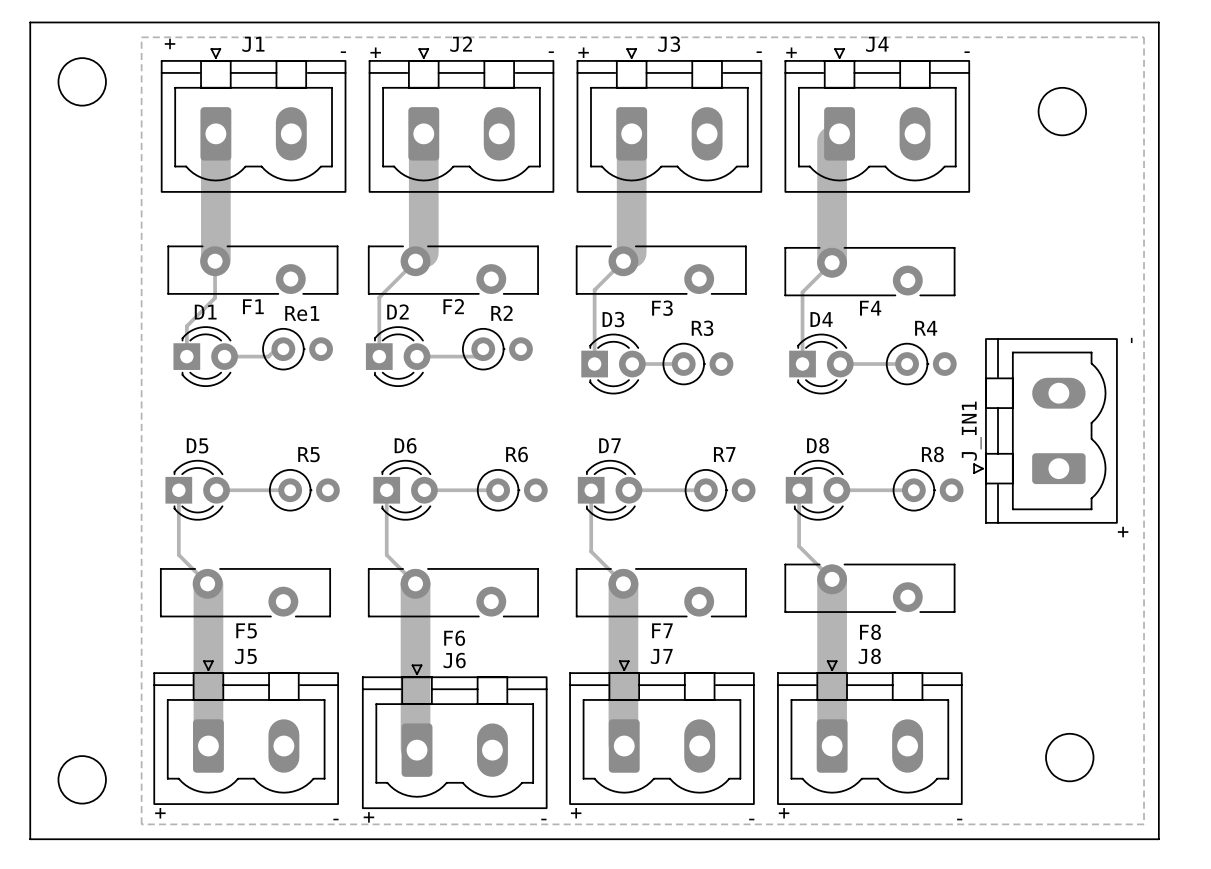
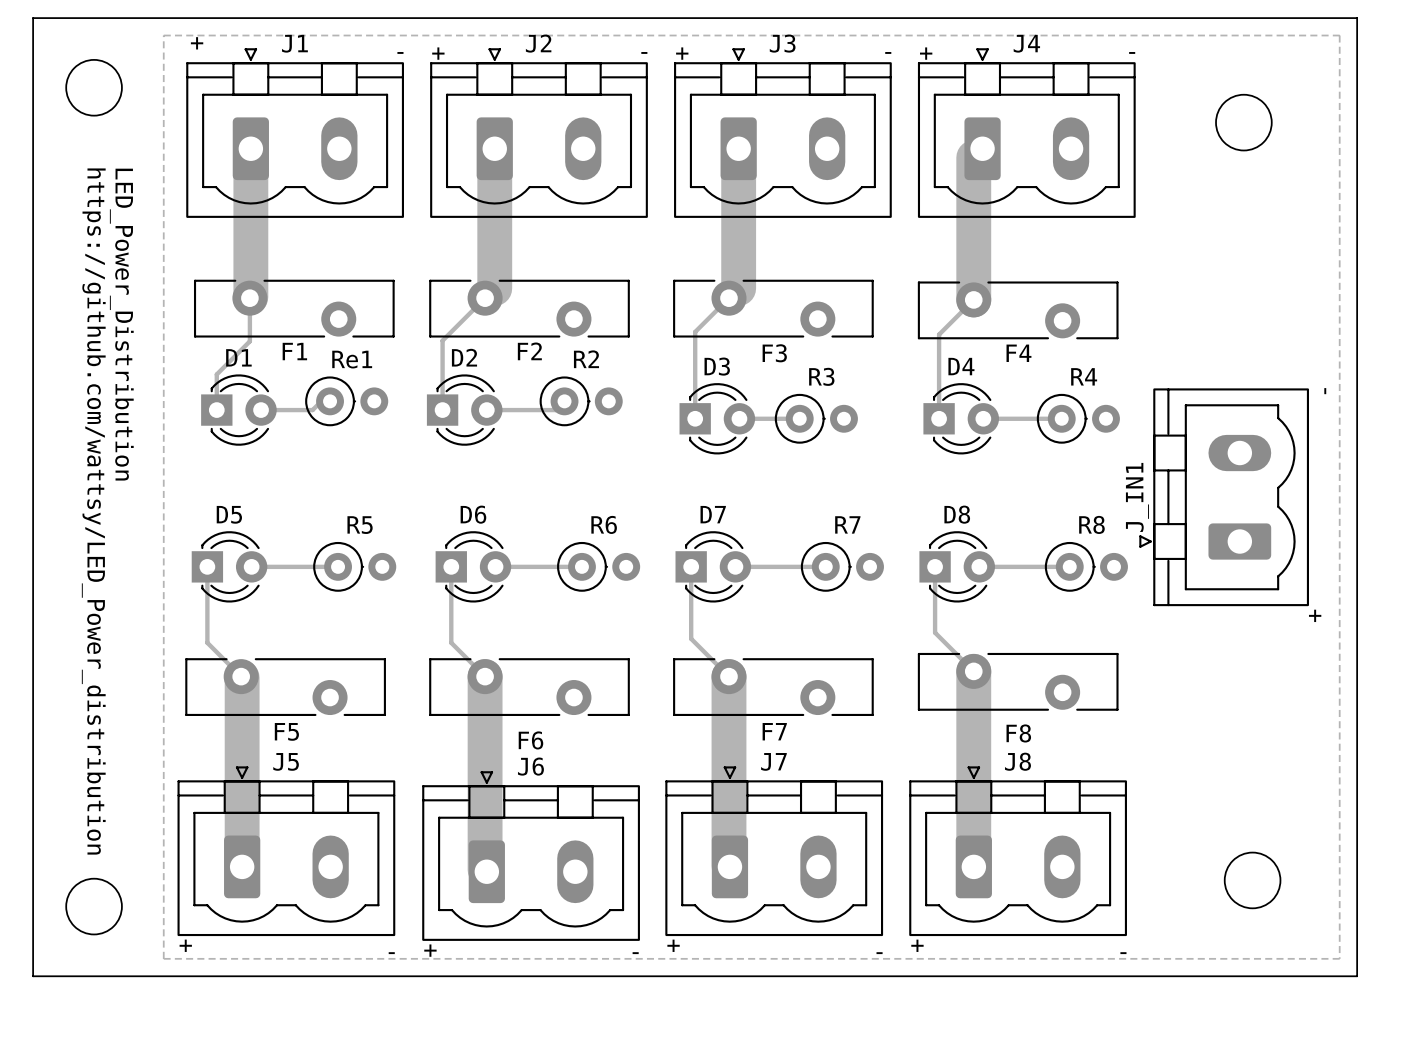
text: none -> LED_Power_Distribution (121, 324)
text: none -> https://github.com/wattsy/LED_Power_distribution (93, 511)

